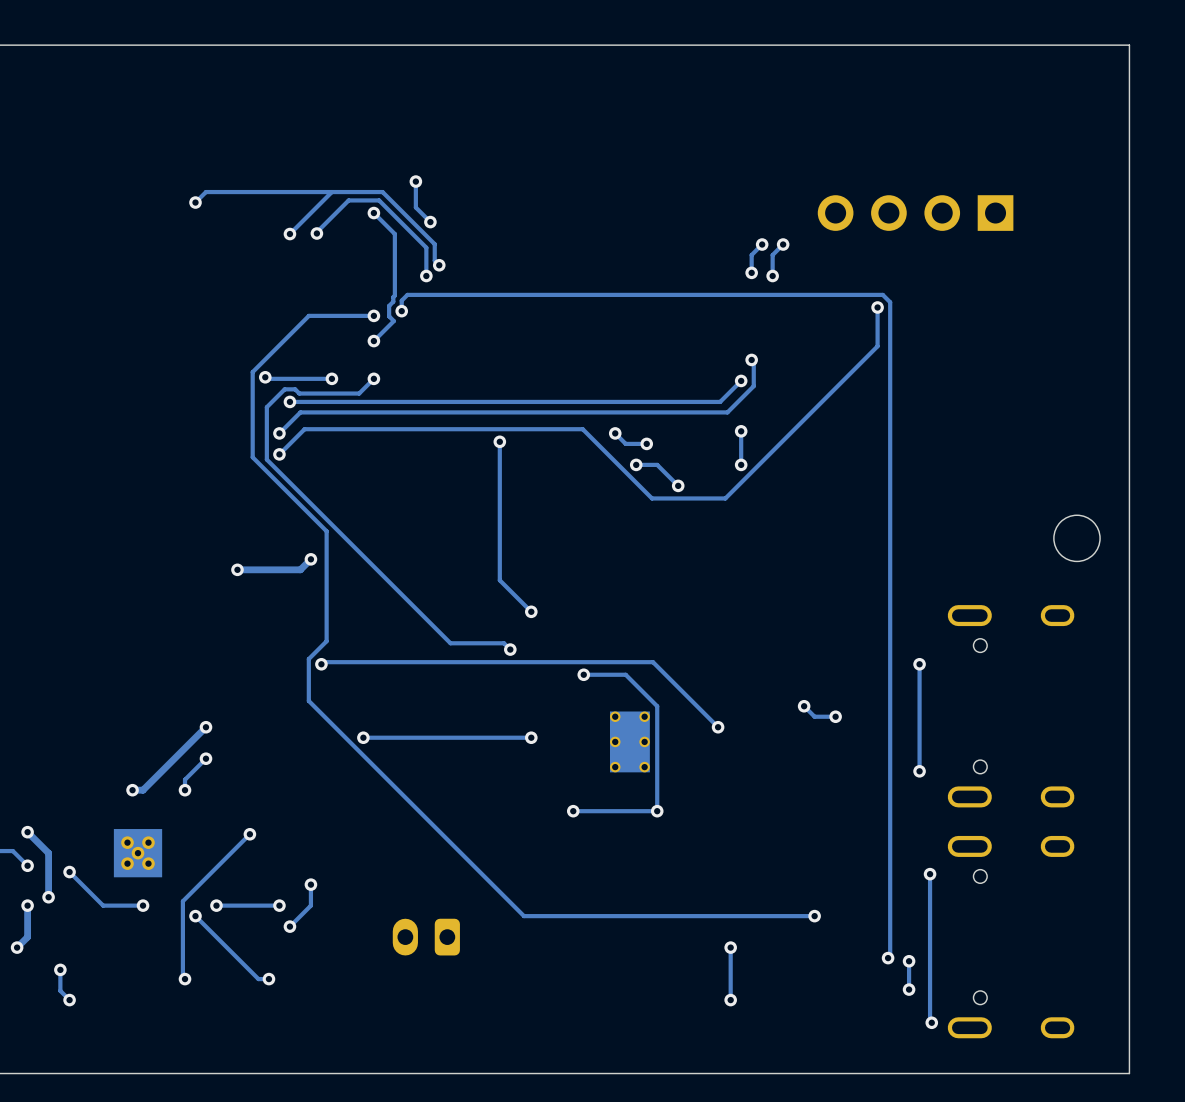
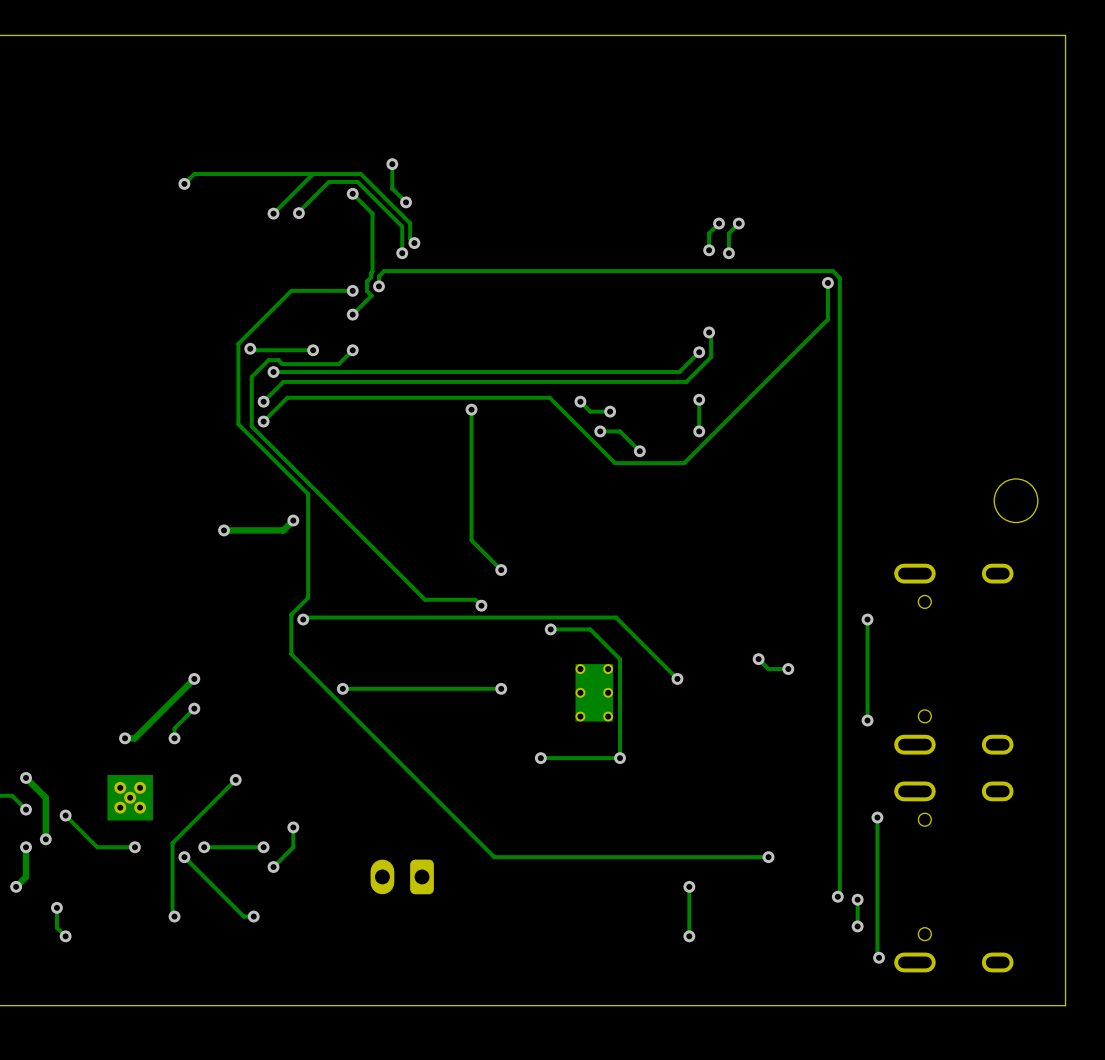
part: (915, 213) -> none

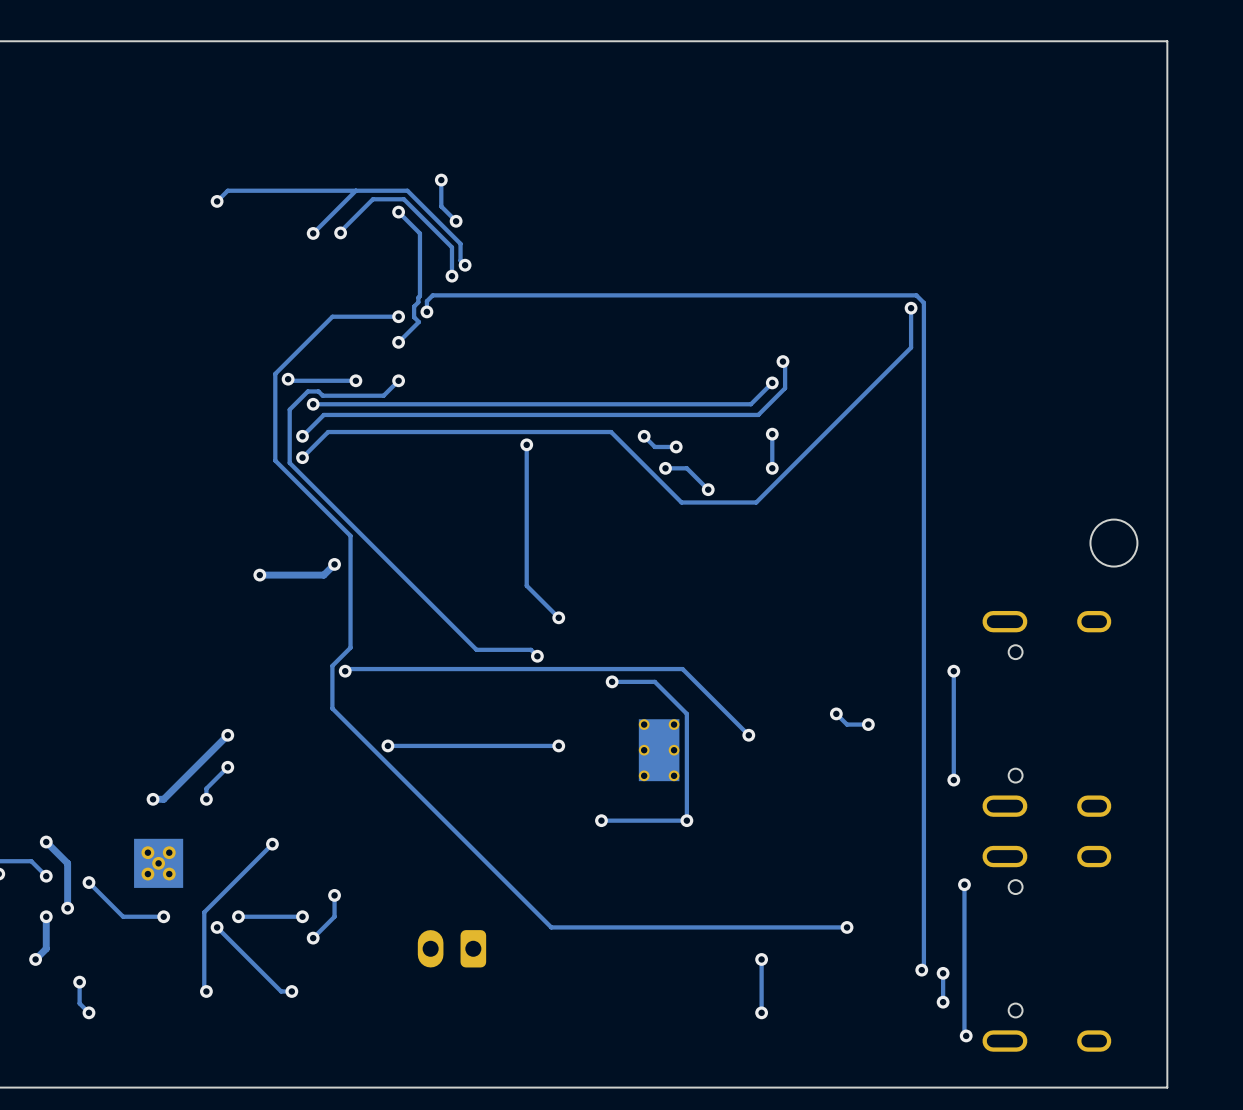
track: (719, 223) (709, 233) (709, 250) -> none
via: (719, 223) -> none
track: (738, 223) (728, 233) (728, 253) -> none
via: (738, 223) -> none
via: (709, 250) -> none
via: (728, 253) -> none

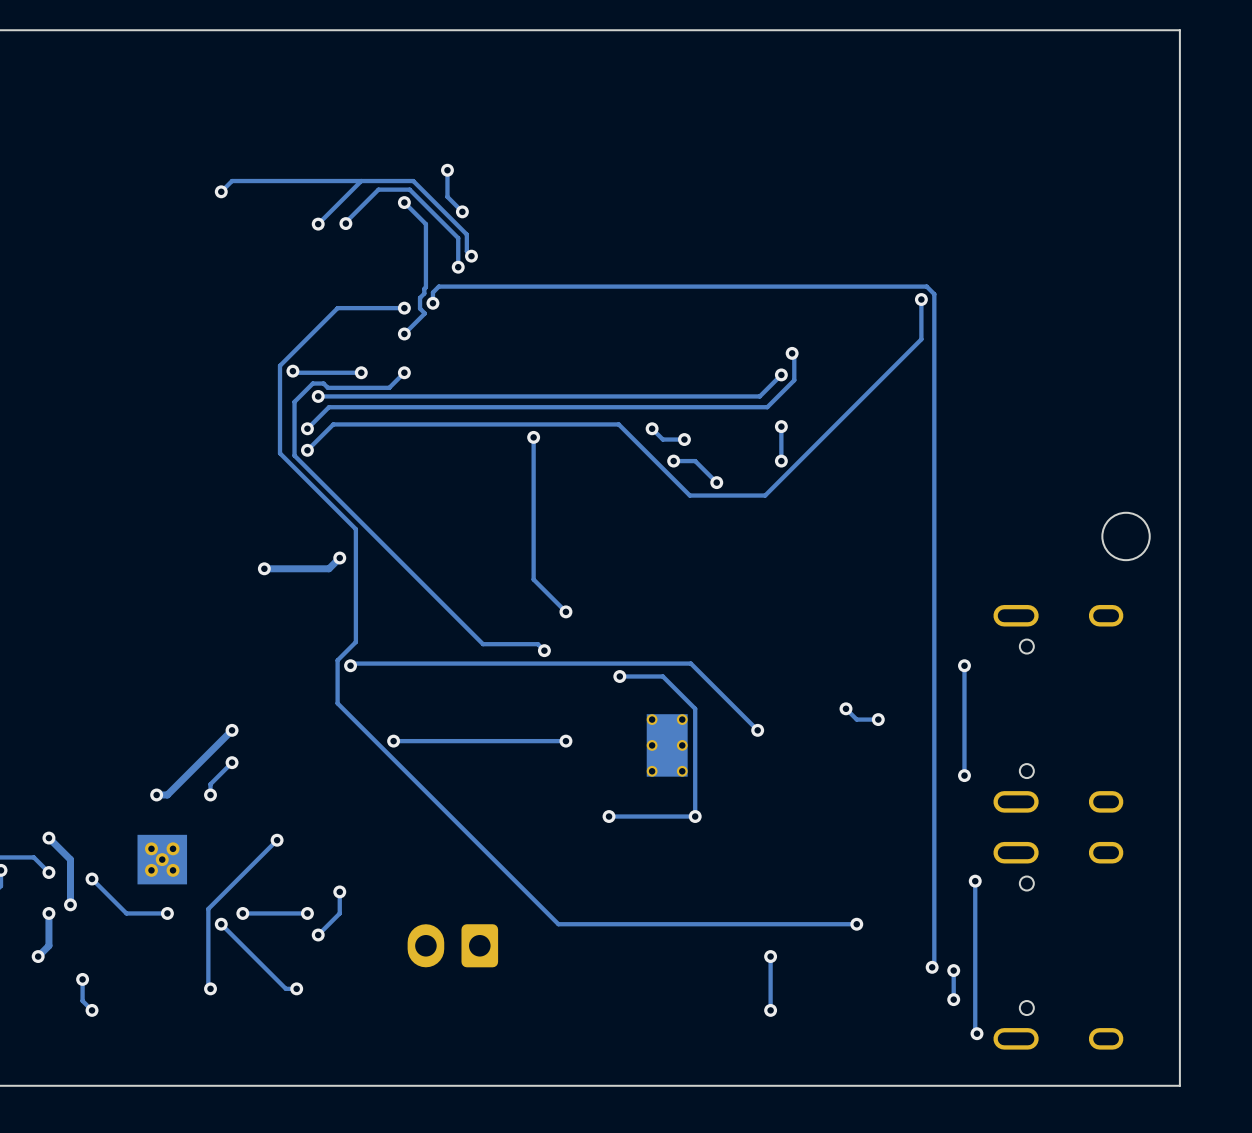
part footprint: [417, 930, 487, 968] -> [407, 924, 499, 968]

